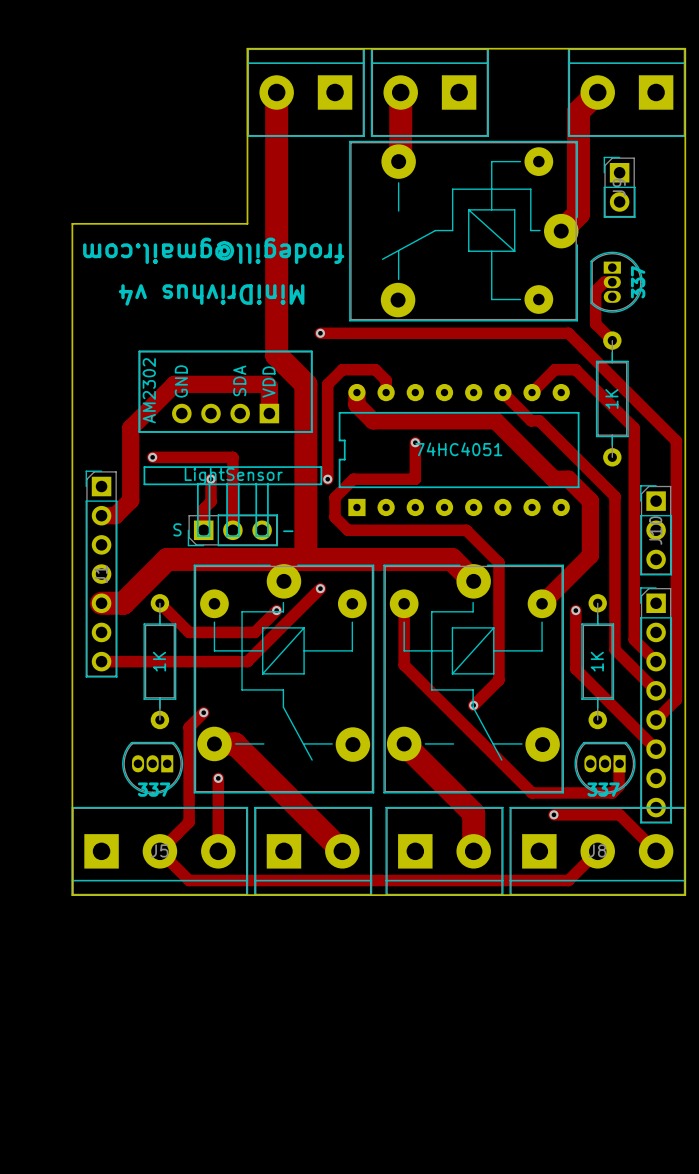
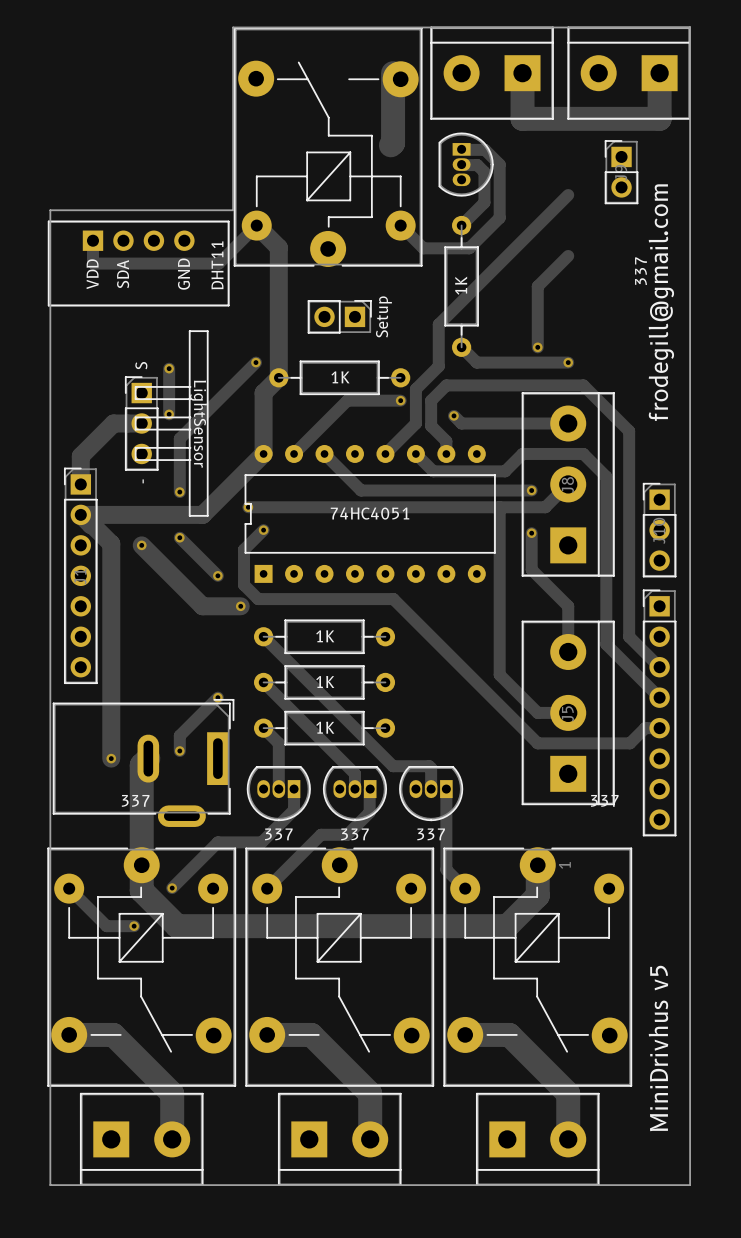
track: (276, 92) (276, 355) (305, 384) (305, 559) -> none
part: (305, 92) -> none
part position: (429, 92) -> (492, 73)
track: none -> (522, 73) (522, 118) (659, 118) (659, 73)
track: (597, 92) (578, 111) (578, 213) (561, 231) -> none
track: none -> (461, 149) (484, 149) (499, 164) (499, 217) (469, 248) (423, 248) (400, 225)
track: none -> (461, 164) (477, 165) (484, 172) (484, 202) (461, 225)
track: none -> (568, 195) (438, 324) (438, 366) (415, 389) (415, 423) (385, 453)
part rotation: 0° (463, 231) -> 90° clockwise (328, 147)
part position: (463, 231) -> (328, 147)
text: frodegill@gmail.com (213, 250) -> none
track: none -> (568, 255) (537, 286) (537, 347)
part: none -> DHT11 (138, 263)
track: (612, 282) (604, 282) (595, 290) (595, 323) (612, 340) -> none
part position: (616, 282) -> (466, 164)
text: MiniDrivhus v4 (211, 294) -> none
part: none -> (461, 286)
text: none -> frodegill@gmail.com (661, 302)
part: none -> (339, 316)
text: none -> Setup (383, 316)
track: (320, 333) (568, 333) (676, 441) (676, 699) (656, 720) -> (263, 530) (244, 549) (244, 584) (258, 599) (393, 599) (537, 743) (629, 743) (645, 728) (659, 728)
via: (320, 333) -> none
via: none -> (537, 347)
track: none -> (255, 362) (179, 438) (179, 492)
via: none -> (255, 362)
track: (554, 369) (532, 392) -> (553, 362) (476, 362) (461, 347)
track: (568, 369) (575, 369) (634, 428) (634, 639) -> (446, 453) (446, 441) (431, 426) (431, 400) (446, 385) (583, 385) (629, 431) (629, 636) (636, 644)
via: none -> (568, 362)
track: none -> (169, 368) (169, 414)
via: none -> (169, 368)
part: none -> (339, 377)
part: AM2302 (225, 391) -> none
track: (356, 392) (356, 404) (373, 420) (495, 420) (553, 479) (568, 479) (590, 501) (590, 555) (542, 603) -> none
track: (386, 392) (386, 380) (375, 369) (342, 369) (327, 384) (327, 479) -> none
track: (502, 392) (531, 420) (539, 420) (614, 496) (614, 649) -> (415, 453) (433, 471) (505, 471) (522, 453) (583, 453) (606, 476) (606, 644) (616, 654)
part: (612, 398) -> none
track: none -> (400, 400) (347, 400) (294, 453)
via: none -> (400, 400)
track: (269, 413) (269, 386) (267, 384) (174, 384) (130, 428) (130, 500) (115, 515) -> (92, 240) (93, 263) (218, 263) (256, 225) (278, 247) (278, 377) (263, 393) (263, 453) (202, 514) (95, 514)
via: none -> (169, 414)
track: none -> (453, 415) (461, 423) (568, 423)
via: none -> (453, 415)
track: none -> (141, 423) (113, 423) (80, 456) (80, 484)
track: (415, 442) (415, 479) (353, 479) (335, 497) (335, 517) (348, 530) (466, 530) (498, 562) (498, 680) (473, 705) -> none
via: (415, 442) -> none
part position: (459, 450) -> (370, 513)
track: (152, 457) (232, 457) (232, 530) -> none
via: (152, 457) -> none
track: none -> (324, 453) (361, 490) (531, 490)
track: (211, 479) (211, 501) (203, 509) (203, 530) -> none
via position: (211, 479) -> (179, 492)
via: (327, 479) -> none
track: none -> (568, 484) (545, 507) (248, 507)
via: none -> (531, 490)
part rotation: 0° (232, 506) -> 90° clockwise (166, 423)
via: none -> (248, 507)
track: none -> (499, 507) (499, 674) (537, 712) (568, 712)
track: none -> (80, 514) (111, 543) (111, 758)
via: none -> (263, 530)
track: none -> (531, 533) (531, 569) (568, 606) (568, 651)
via: none -> (531, 533)
track: none -> (179, 537) (217, 575)
via: none -> (179, 537)
track: none -> (141, 545) (202, 606) (240, 606)
via: none -> (141, 545)
via: none -> (217, 575)
track: (473, 581) (451, 559) (167, 559) (123, 603) (101, 603) -> none
track: (320, 588) (247, 661) (101, 661) -> none
via: (320, 588) -> none
track: (159, 603) (189, 632) (254, 632) (276, 610) -> none
track: (404, 603) (404, 665) (532, 792) (612, 792) (619, 786) (619, 763) -> none
via position: (276, 610) -> (240, 606)
track: (575, 610) (575, 668) (656, 749) -> none
via: (575, 610) -> none
track: none -> (263, 636) (393, 766) (429, 766) (431, 768) (431, 789)
part: none -> (324, 636)
part: (159, 661) -> none
part: (597, 661) -> none
track: none -> (263, 682) (354, 773) (354, 789)
part: none -> (324, 682)
part: (283, 678) -> none
part: (473, 678) -> none
track: none -> (217, 697) (179, 735) (179, 750)
via: none -> (217, 697)
via: (473, 705) -> none
track: (203, 712) (189, 727) (189, 822) (159, 851) (189, 880) (568, 880) (597, 851) -> none
via: (203, 712) -> none
track: none -> (263, 728) (278, 743) (278, 789)
part: none -> (324, 728)
via: none -> (179, 750)
track: (214, 743) (234, 743) (342, 851) -> none
track: (404, 743) (473, 813) (473, 851) -> none
via: none -> (111, 758)
track: none -> (148, 758) (141, 765) (141, 890) (177, 926) (507, 926) (537, 895) (537, 865)
part: none -> (143, 763)
part: (152, 768) -> none
part: (605, 768) -> none
track: (218, 778) (218, 851) -> none
via: (218, 778) -> none
track: none -> (294, 789) (294, 810) (261, 842) (217, 842) (172, 888)
track: none -> (370, 789) (369, 812) (347, 834) (321, 834) (267, 888)
track: none -> (446, 789) (446, 869) (465, 888)
part: none -> (278, 793)
part: none -> (354, 793)
part: none -> (431, 793)
track: (553, 814) (619, 814) (656, 851) -> none
via: (553, 814) -> none
text: none -> 337 (278, 834)
text: none -> 337 (354, 834)
text: none -> 337 (431, 834)
J5 rotation: 0° (159, 851) -> 90° counterclockwise (568, 712)
J5 position: (159, 851) -> (568, 712)
part: (313, 851) -> none
part: (444, 851) -> none
J8 rotation: 0° (597, 851) -> 90° counterclockwise (568, 484)
J8 position: (597, 851) -> (568, 484)
track: none -> (69, 888) (106, 926) (134, 926)
via: none -> (172, 888)
board edge: (72, 895) (685, 895) -> (50, 910) (50, 1185) (690, 1185) (690, 910)
via: none -> (134, 926)
part: none -> (141, 966)
part: none -> (339, 966)
part: none -> (537, 966)
track: none -> (69, 1034) (113, 1034) (172, 1093) (172, 1139)
track: none -> (267, 1034) (311, 1034) (370, 1093) (370, 1139)
track: none -> (465, 1034) (509, 1034) (568, 1093) (568, 1139)
text: none -> MiniDrivhus v5 (658, 1048)
part: none -> (141, 1139)
part: none -> (339, 1139)
part: none -> (537, 1139)

